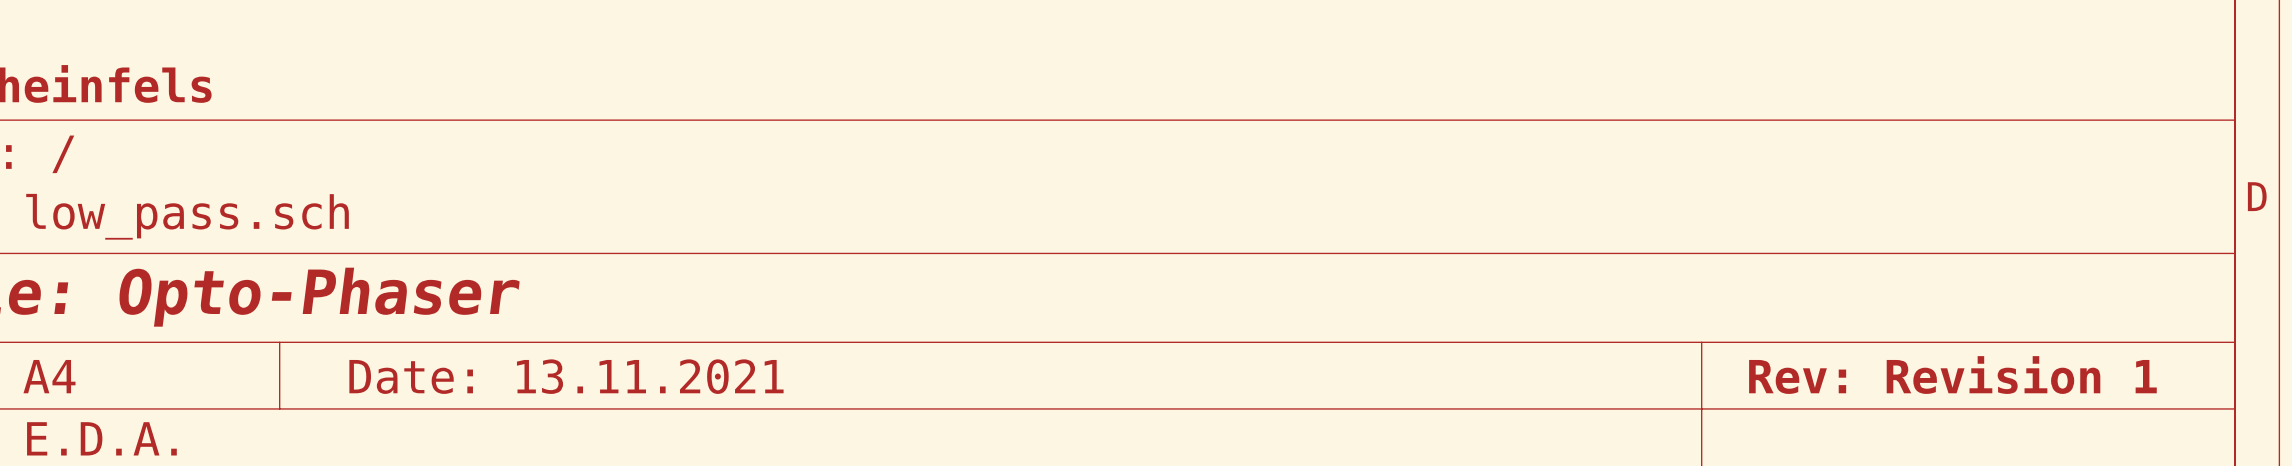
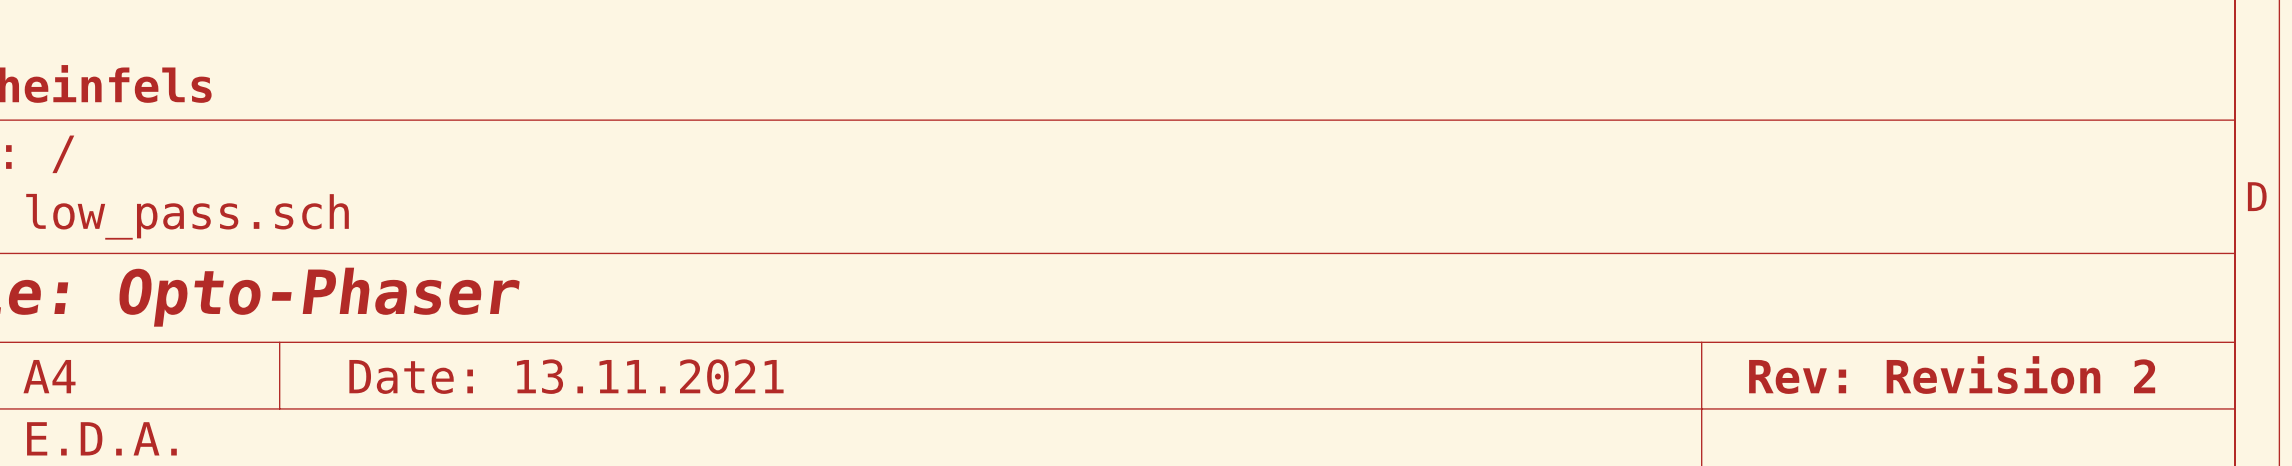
title block: Rev: Revision 1 (1952, 375) -> Rev: Revision 2 (1952, 375)

